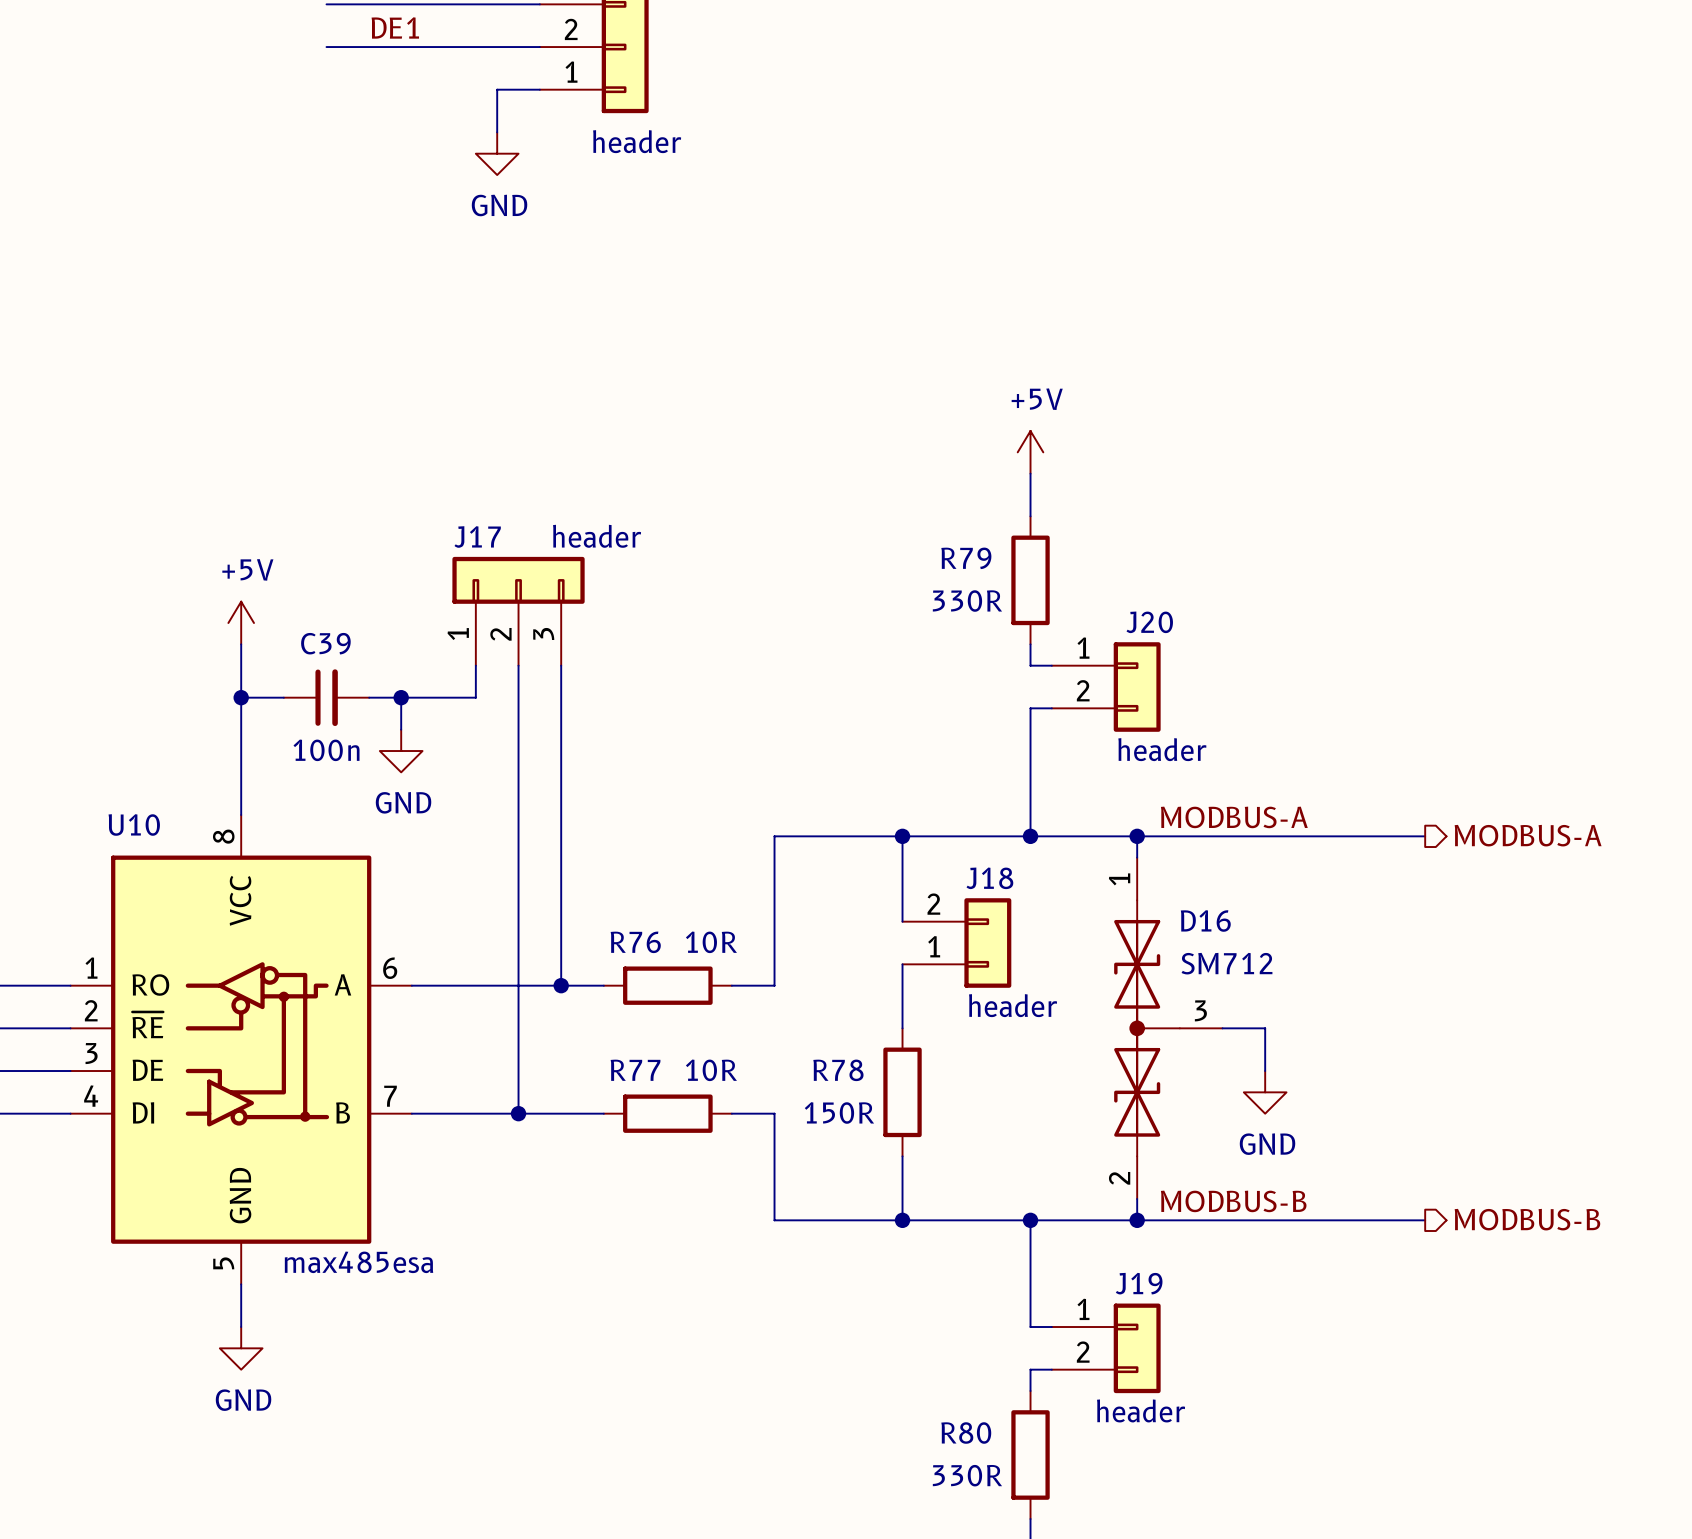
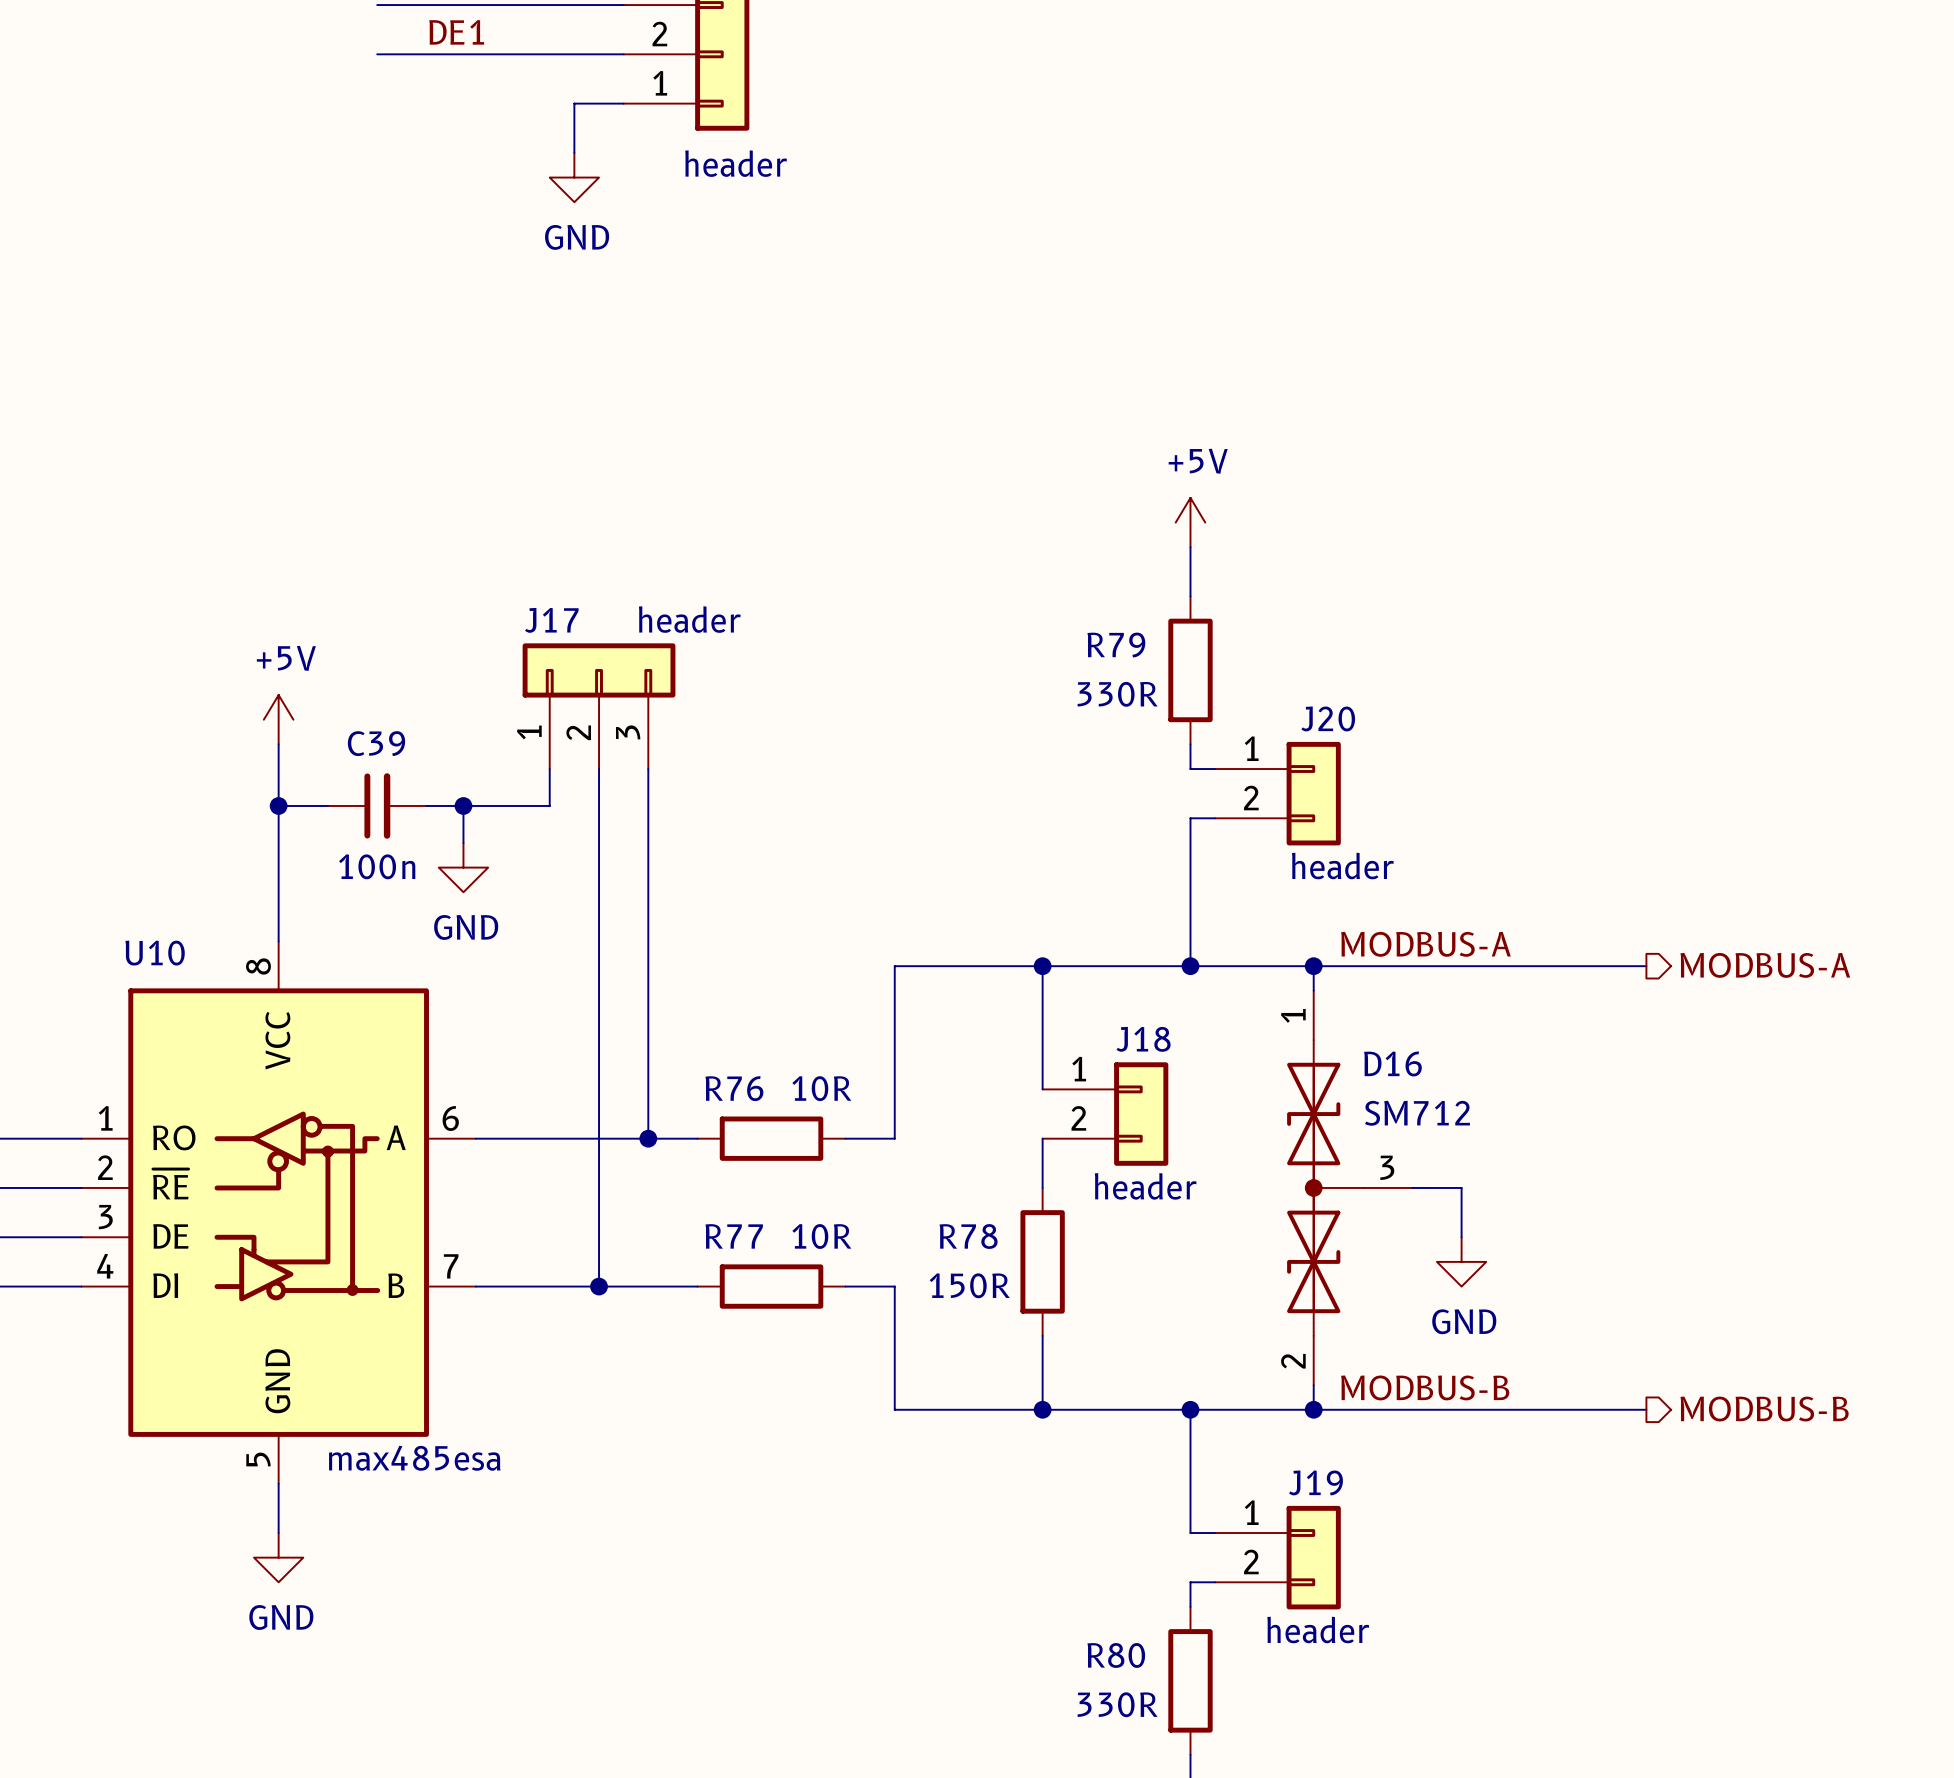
J18 flip: as is (987, 943) -> up-down (1141, 1114)
wire: (902, 964) (902, 985) -> (1042, 1064) (1042, 1089)

